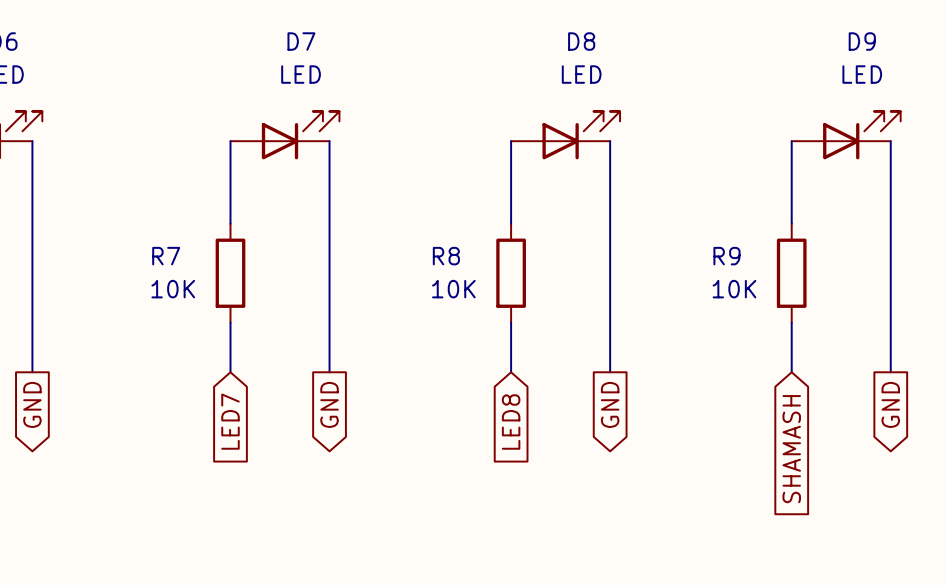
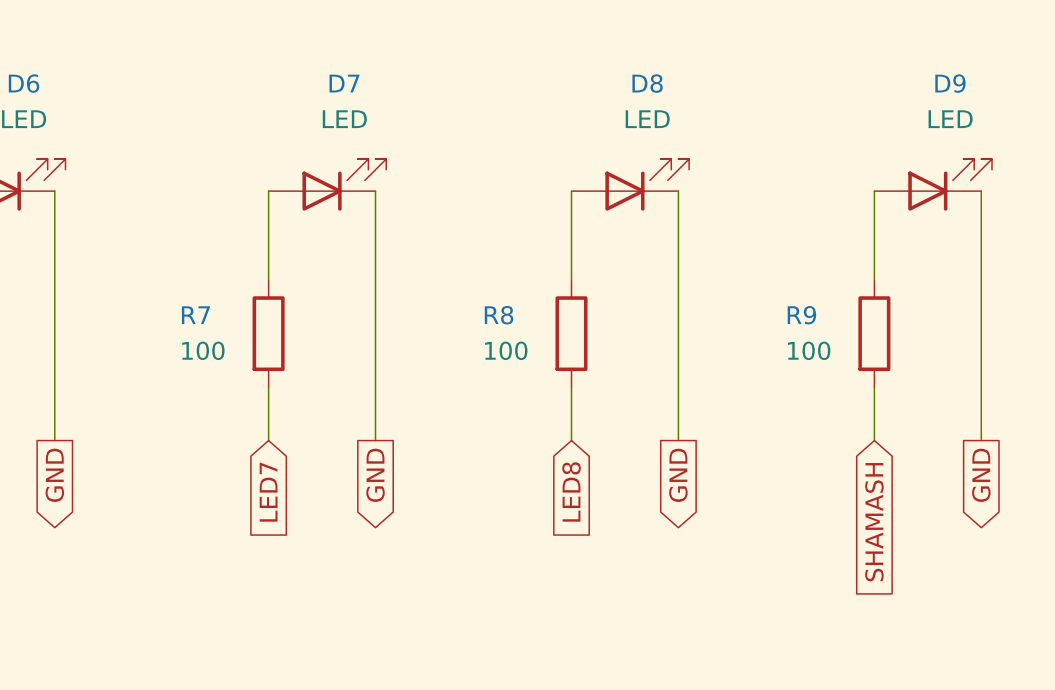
R7 value: 10K (173, 289) -> 100 (203, 350)
R8 value: 10K (453, 289) -> 100 (506, 350)
R9 value: 10K (734, 289) -> 100 (809, 350)

